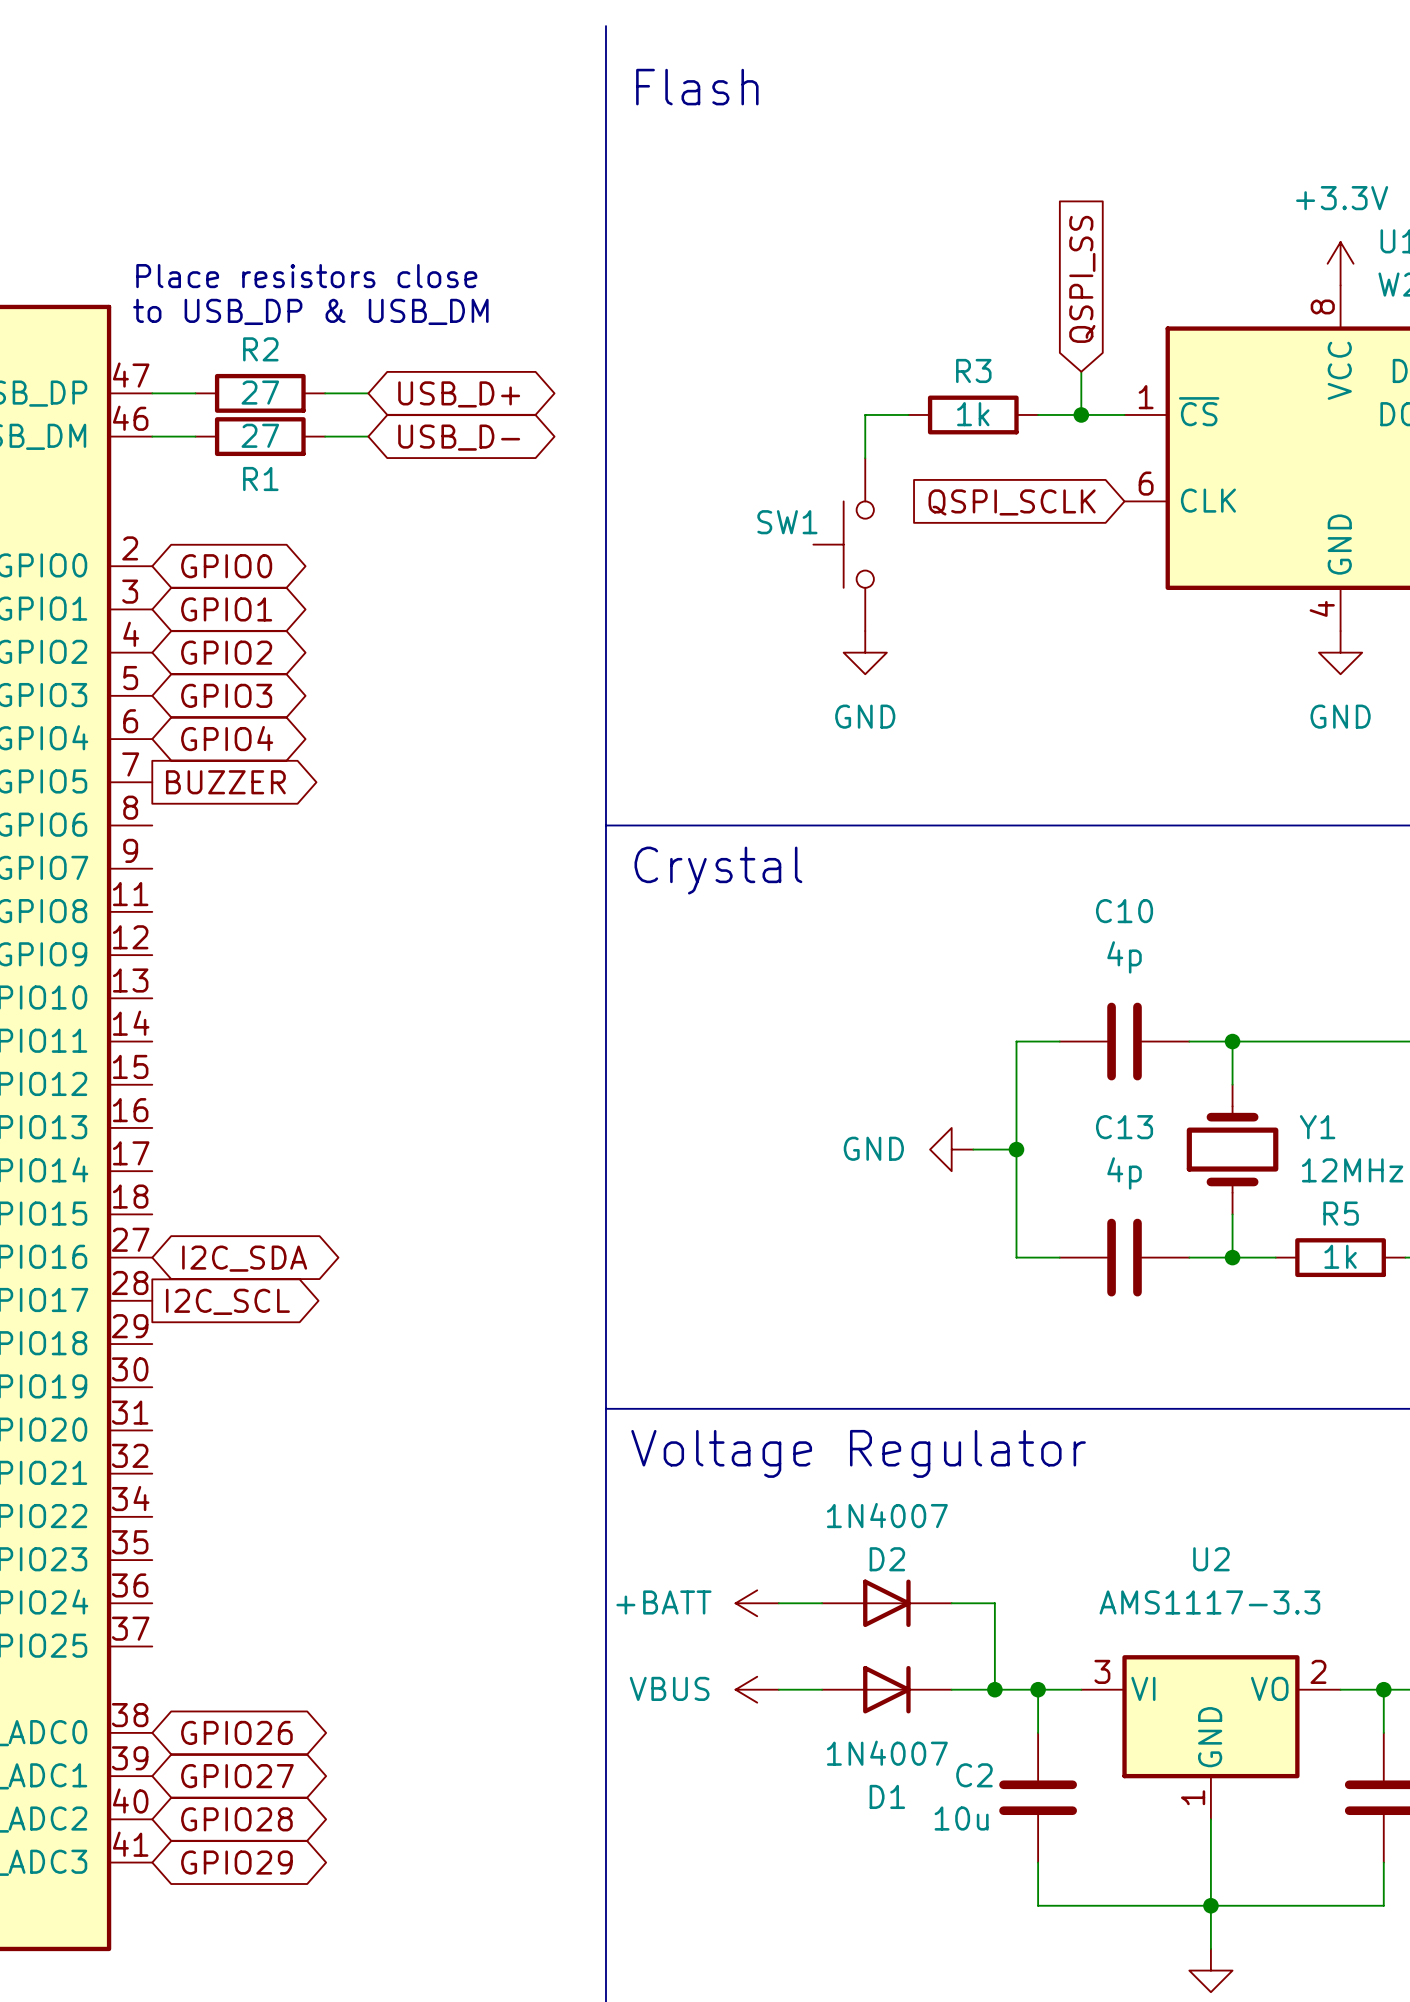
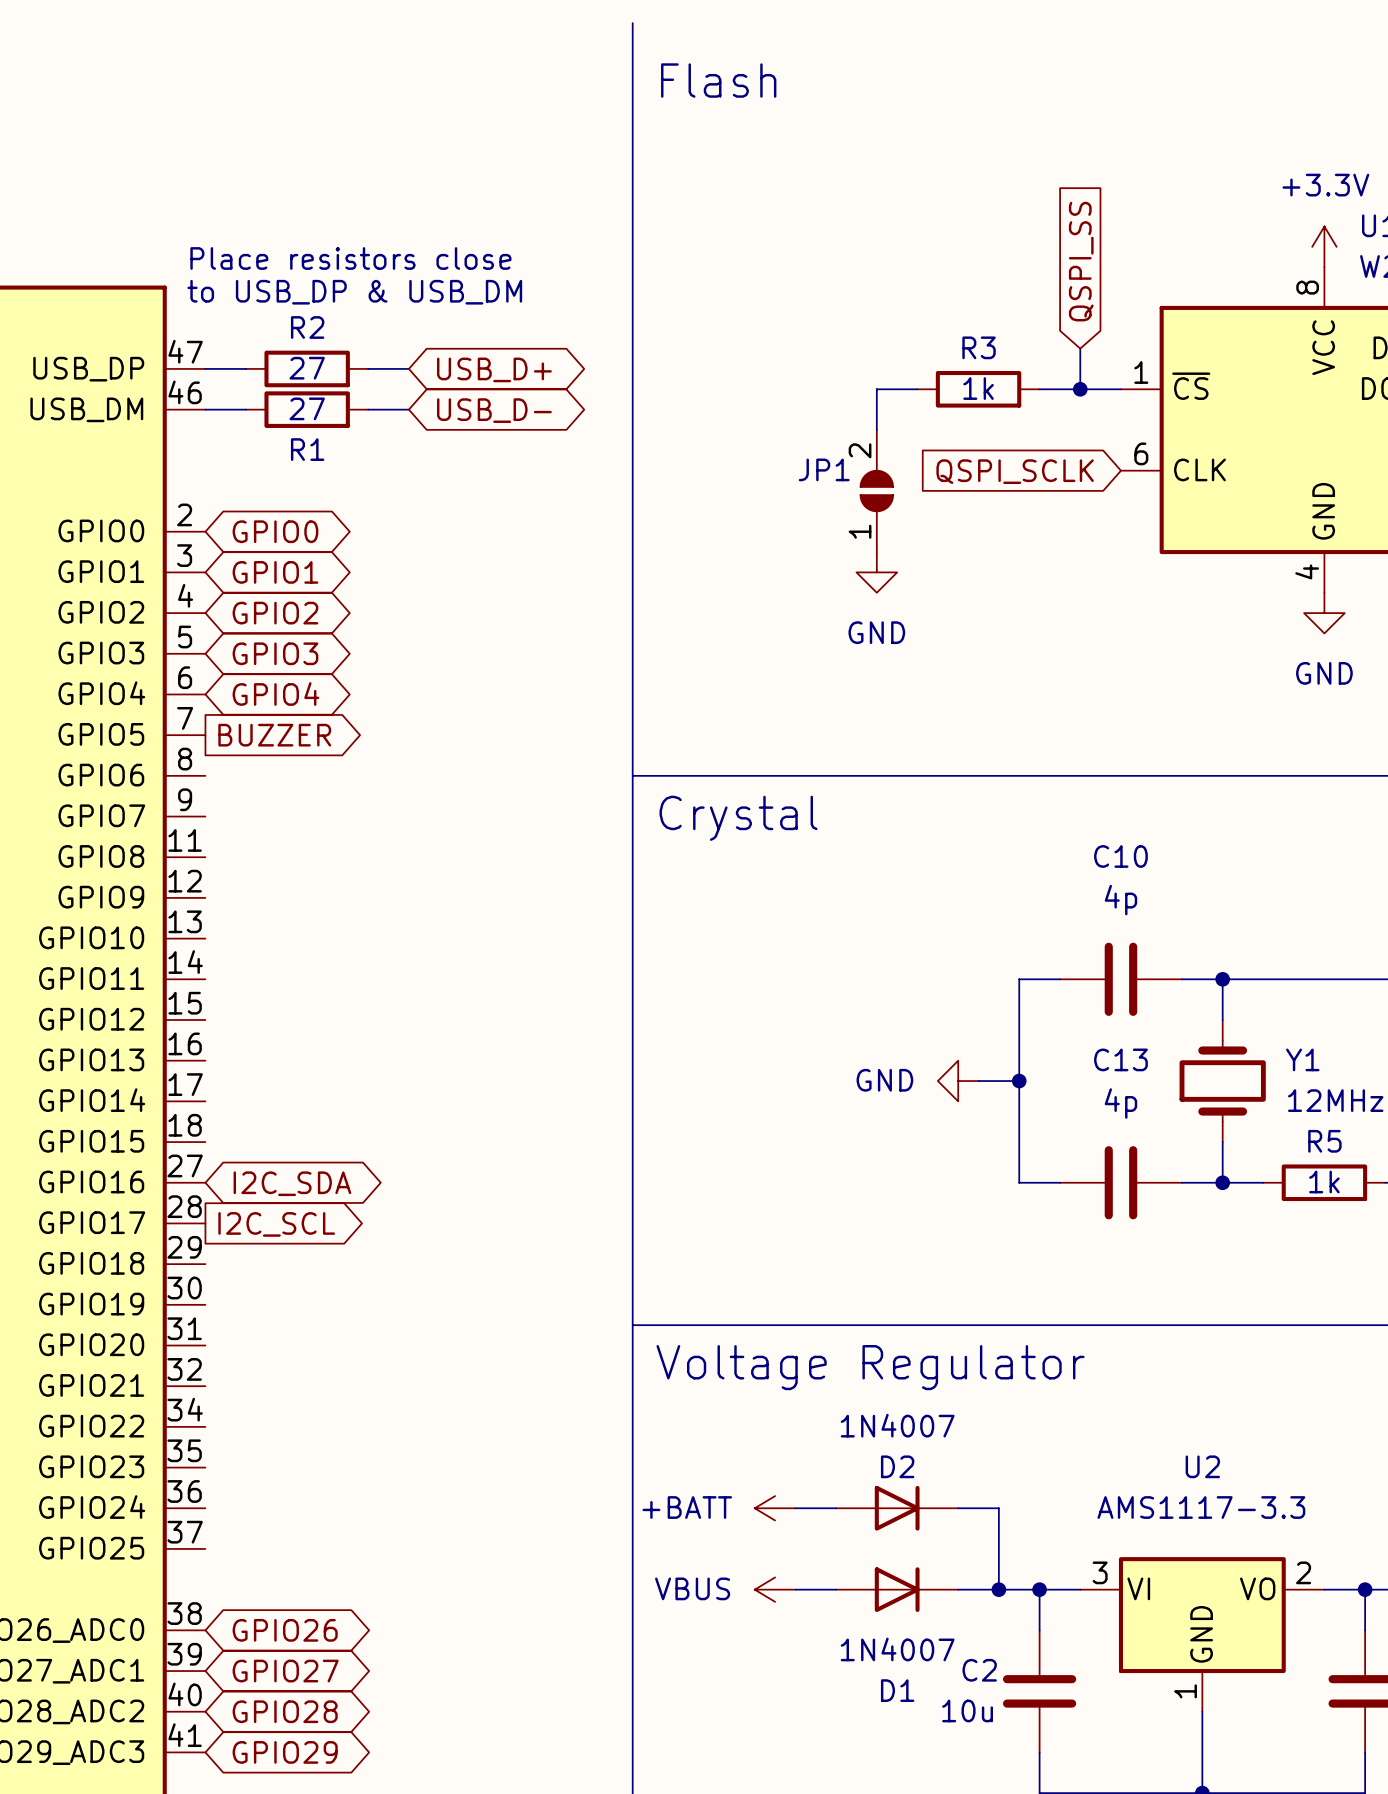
JP1: none -> (876, 491)
SW1: (843, 544) -> none
power symbol position: GND (865, 652) -> GND (876, 572)

